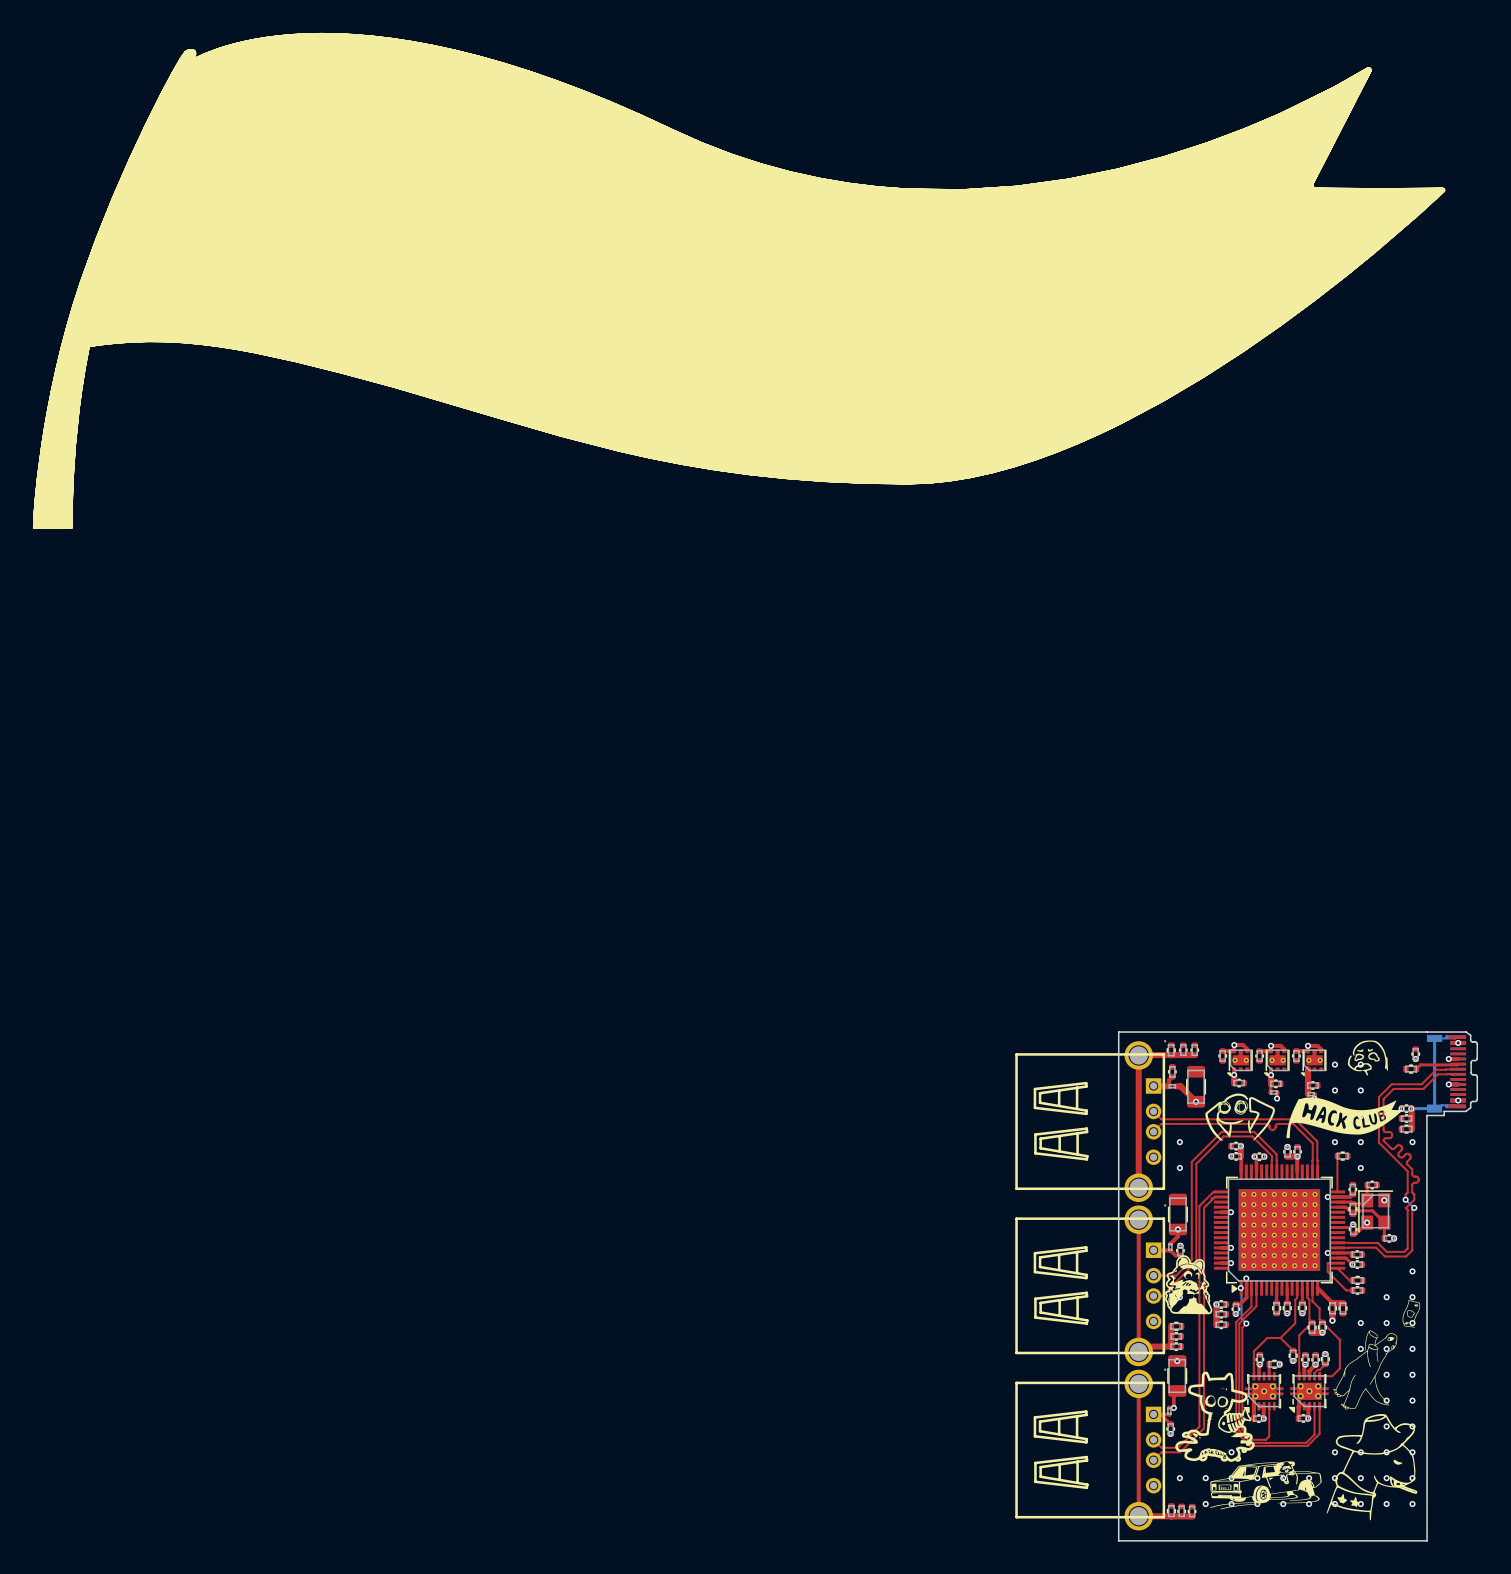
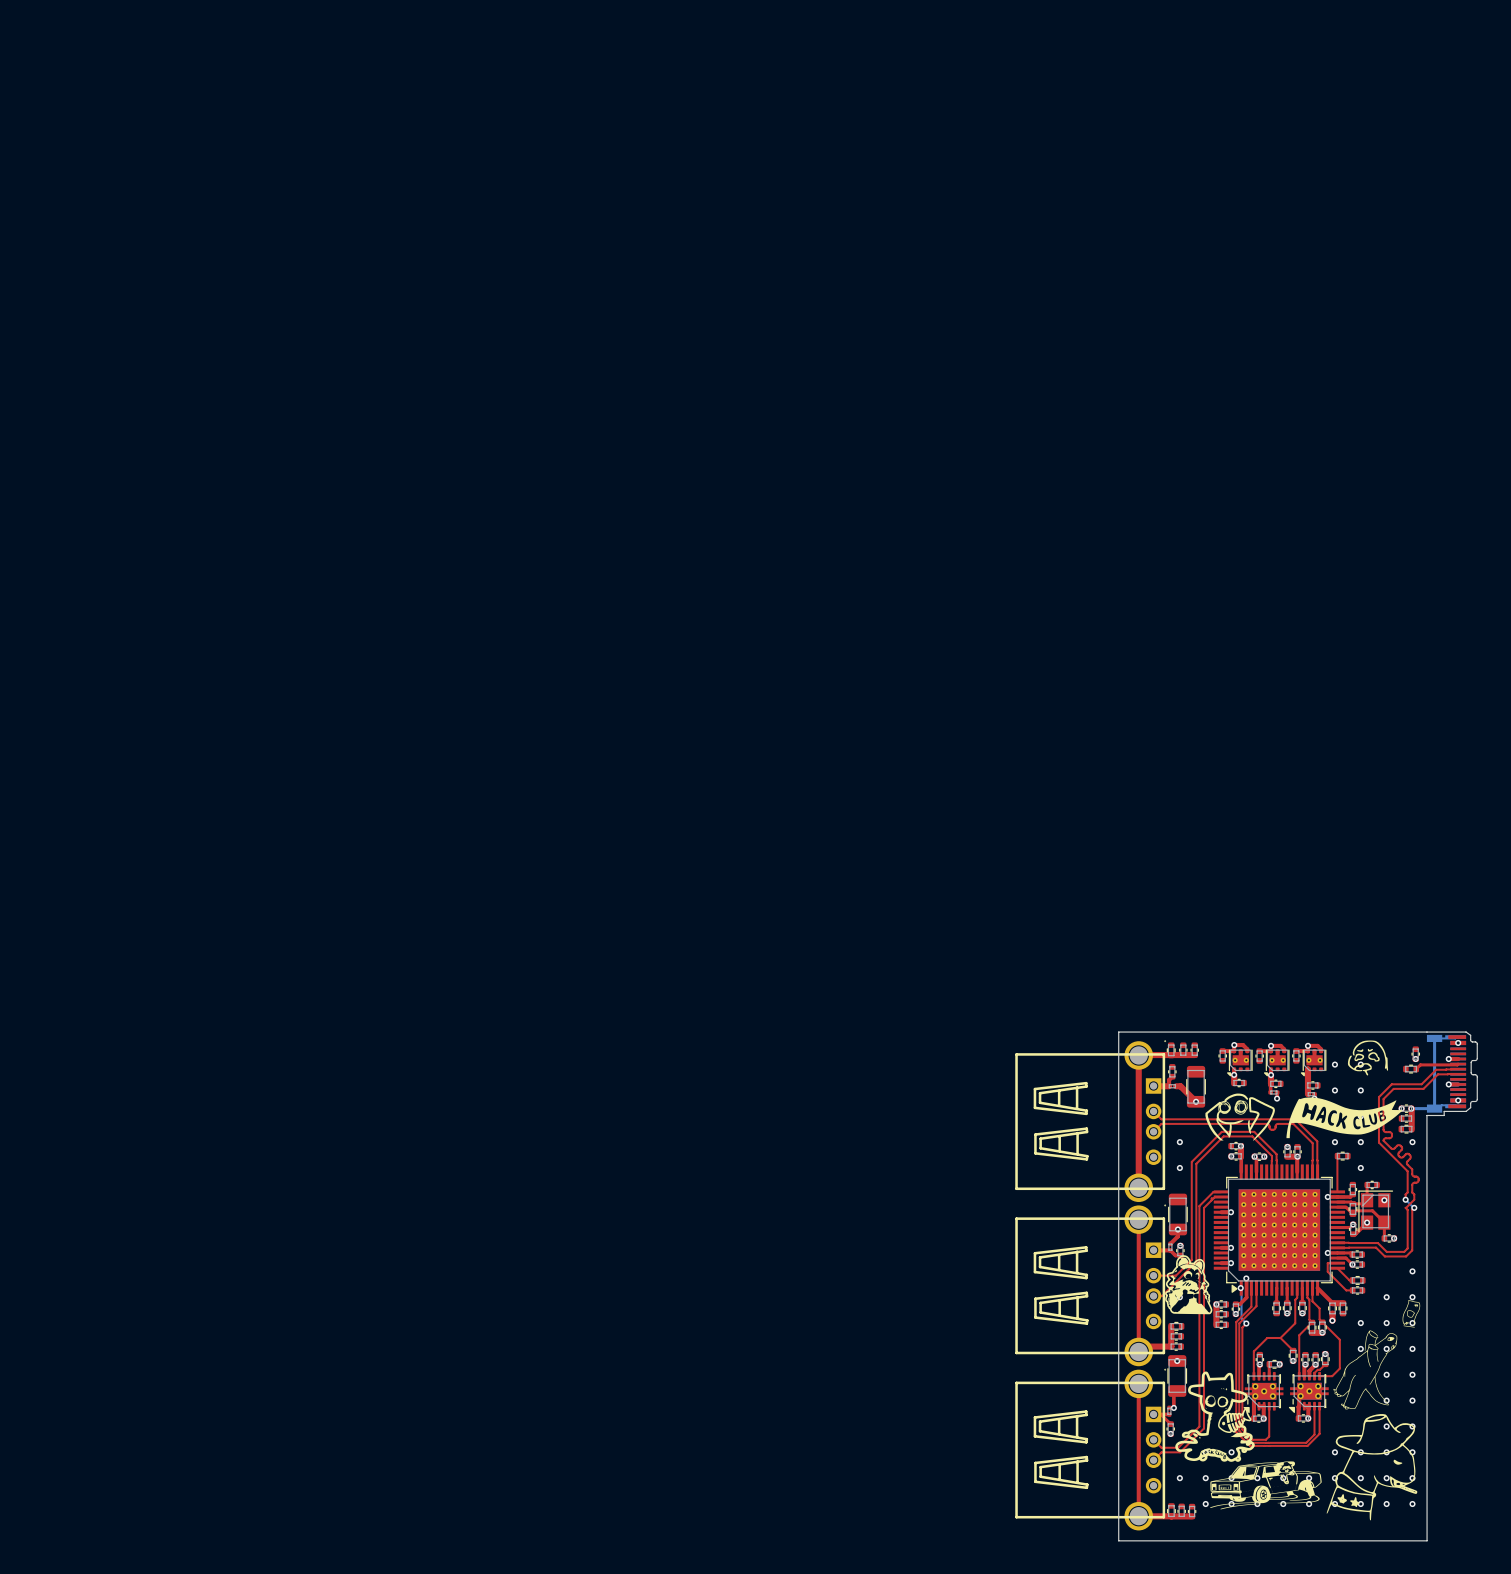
drawing: [32, 32, 1446, 529] -> none

